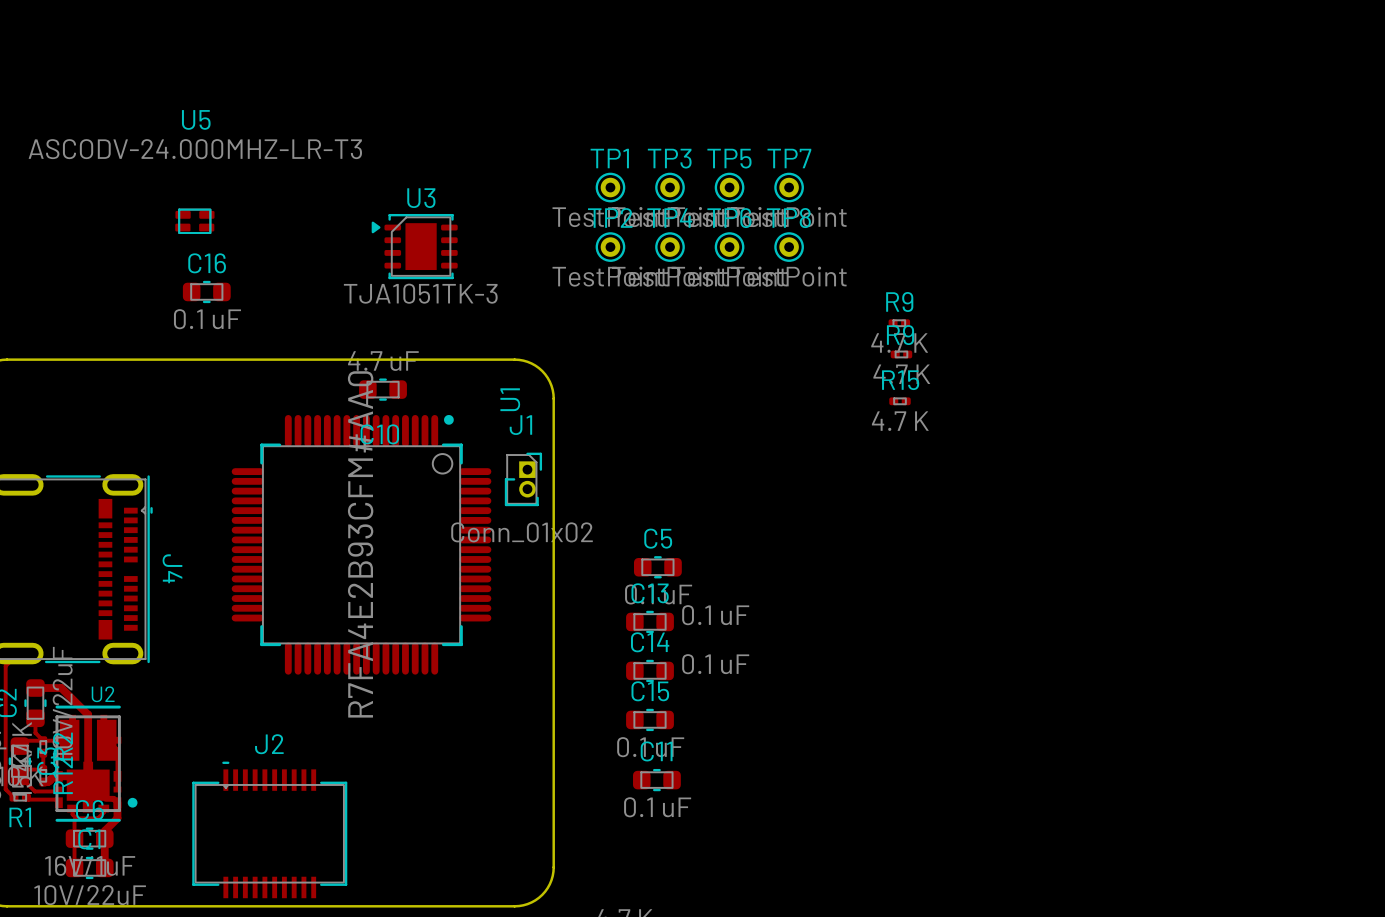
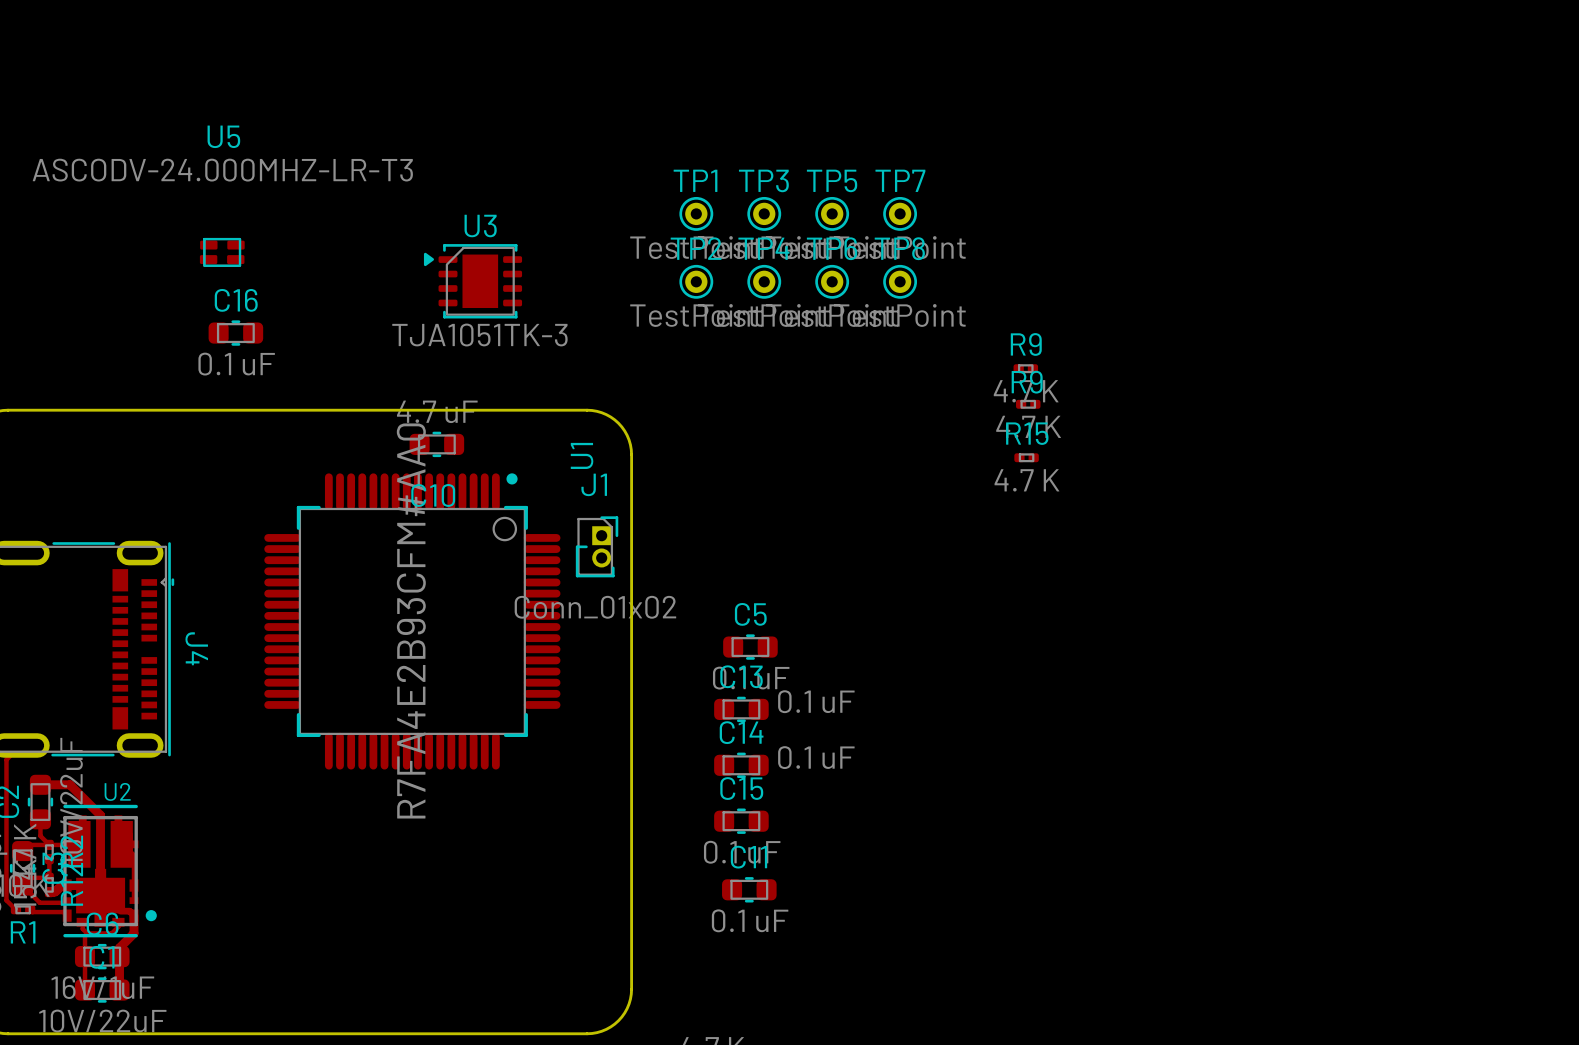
J2: (269, 829) -> none

